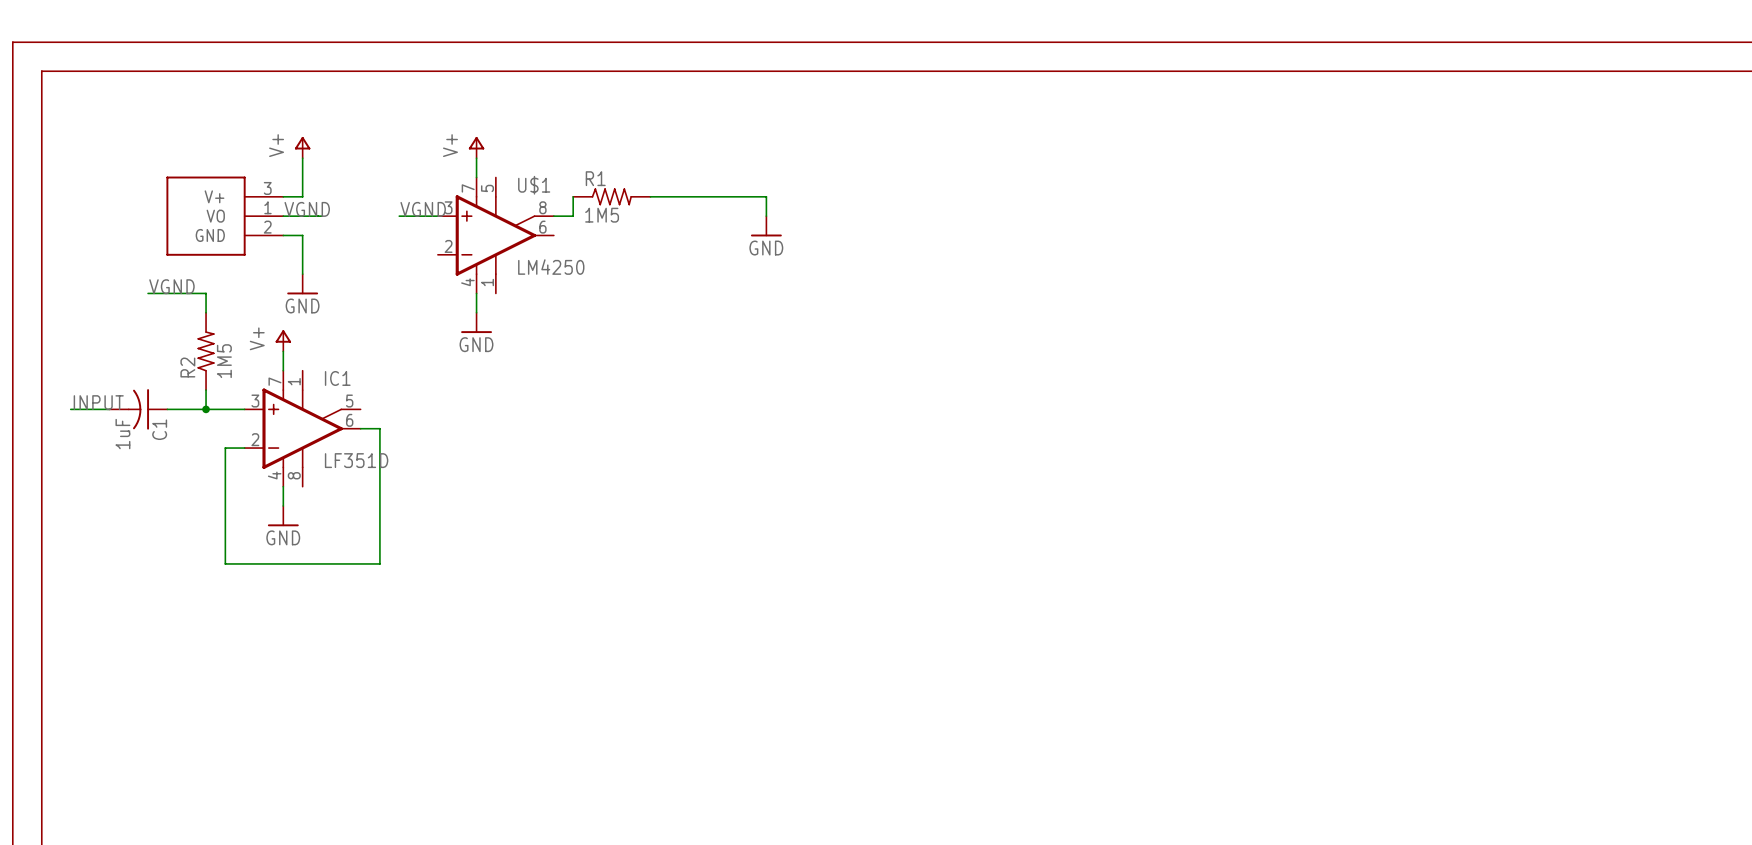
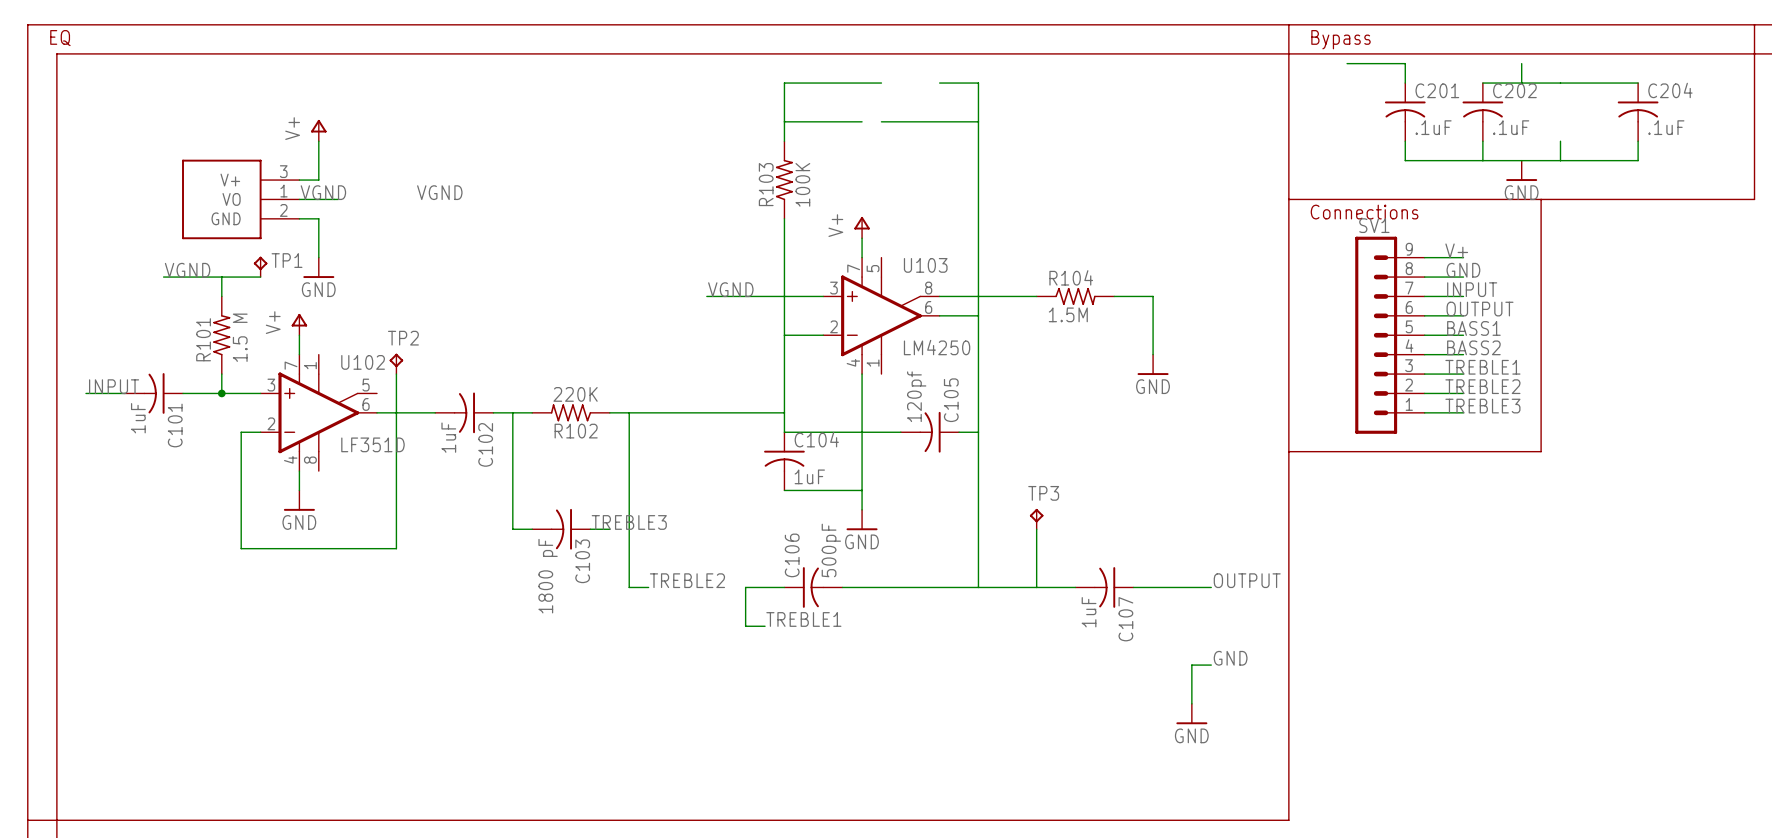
line: none -> (1288, 24) (1288, 820) (27, 820)
line: none -> (1754, 24) (1754, 199) (1288, 199)
text: none -> EQ (60, 38)
text: none -> Bypass (1341, 39)
wire: none -> (1347, 63) (1405, 63) (1405, 83)
wire: none -> (1521, 63) (1521, 83)
wire: none -> (881, 83) (784, 83) (784, 141)
wire: none -> (939, 83) (978, 83) (978, 587)
wire: none -> (1482, 83) (1638, 83)
C201: none -> .1uF (1405, 112)
C202: none -> .1uF (1482, 112)
C204: none -> .1uF (1638, 112)
wire: none -> (784, 121) (862, 121)
wire: none -> (881, 121) (978, 121)
power symbol: V+ (476, 147) -> none
wire: (476, 158) (476, 177) -> none
wire: none -> (1405, 141) (1405, 160) (1638, 160) (1638, 141)
wire: none -> (1482, 141) (1482, 160)
wire: none -> (1560, 141) (1560, 160)
power symbol: none -> GND (1521, 170)
wire: (573, 196) (573, 216) (553, 216) -> none
R1: 1M5 (611, 196) -> none
wire: (650, 196) (766, 196) (766, 216) -> none
R103: none -> 100K (784, 180)
wire: (399, 216) (437, 216) -> none
line: none -> (1541, 199) (1541, 451) (1288, 451)
power symbol: GND (766, 226) -> none
text: none -> Connections (1364, 212)
U$1: LM4250 (495, 235) -> none
wire: none -> (784, 218) (784, 432) (900, 432)
power symbol: none -> V+ (862, 227)
wire: none -> (862, 238) (862, 257)
label: none -> V+ (1456, 250)
wire: none -> (1424, 257) (1463, 257)
TP1: none -> (260, 266)
label: none -> GND (1463, 270)
wire: none -> (221, 277) (260, 277)
wire: (476, 293) (476, 312) -> none
wire: none -> (1424, 277) (1463, 277)
label: none -> VGND (730, 289)
label: none -> INPUT (1472, 289)
wire: none -> (706, 296) (823, 296)
wire: none -> (939, 296) (1036, 296)
R104: none -> 1.5M (1075, 296)
wire: none -> (1114, 296) (1153, 296) (1153, 354)
wire: none -> (1424, 296) (1463, 296)
power symbol: GND (476, 322) -> none
label: none -> OUTPUT (1480, 309)
U103: none -> LM4250 (881, 315)
wire: none -> (939, 315) (978, 315)
wire: none -> (1424, 315) (1463, 315)
label: none -> BASS1 (1473, 328)
wire: none -> (784, 335) (823, 335)
SV1: none -> (1389, 335)
wire: none -> (1424, 335) (1463, 335)
R2 value: 1M5 (224, 361) -> 1.5 M (240, 337)
label: none -> BASS2 (1473, 347)
R2 name: R2 (187, 367) -> R101 (203, 339)
wire: none -> (1424, 354) (1463, 354)
IC1 name: IC1 (337, 378) -> U102 (363, 362)
TP2: none -> (396, 363)
power symbol: none -> GND (1153, 364)
label: none -> TREBLE1 (1482, 367)
wire: none -> (396, 374) (396, 412) (435, 412)
wire: none -> (862, 374) (862, 509)
wire: none -> (1424, 374) (1463, 374)
label: none -> TREBLE2 (1482, 386)
wire: none -> (1424, 393) (1463, 393)
label: none -> TREBLE3 (1482, 406)
C102: none -> 1uF (464, 412)
wire: none -> (493, 412) (532, 412)
wire: none -> (512, 412) (512, 529) (532, 529)
R102: none -> 220K (571, 412)
wire: none -> (609, 412) (784, 412)
wire: none -> (629, 412) (629, 587) (648, 587)
wire: none -> (1424, 412) (1463, 412)
C1 name: C1 (159, 429) -> C101 (175, 425)
C105: none -> 120pf (929, 432)
wire: none -> (959, 432) (978, 432)
C104: none -> 1uF (784, 461)
wire: none -> (784, 490) (862, 490)
TP3: none -> (1036, 519)
power symbol: none -> GND (862, 520)
label: none -> TREBLE3 (629, 522)
C103: none -> 1800 pF (561, 529)
wire: none -> (590, 529) (609, 529)
wire: none -> (1036, 529) (1036, 587)
label: none -> TREBLE2 (687, 580)
label: none -> OUTPUT (1247, 580)
wire: none -> (784, 587) (745, 587) (745, 626) (765, 626)
C106: none -> 500pF (813, 587)
wire: none -> (842, 587) (1075, 587)
C107: none -> 1uF (1104, 587)
wire: none -> (1133, 587) (1211, 587)
label: none -> TREBLE1 (803, 619)
label: none -> GND (1230, 658)
wire: none -> (1211, 665) (1191, 665) (1191, 703)
power symbol: none -> GND (1191, 714)

